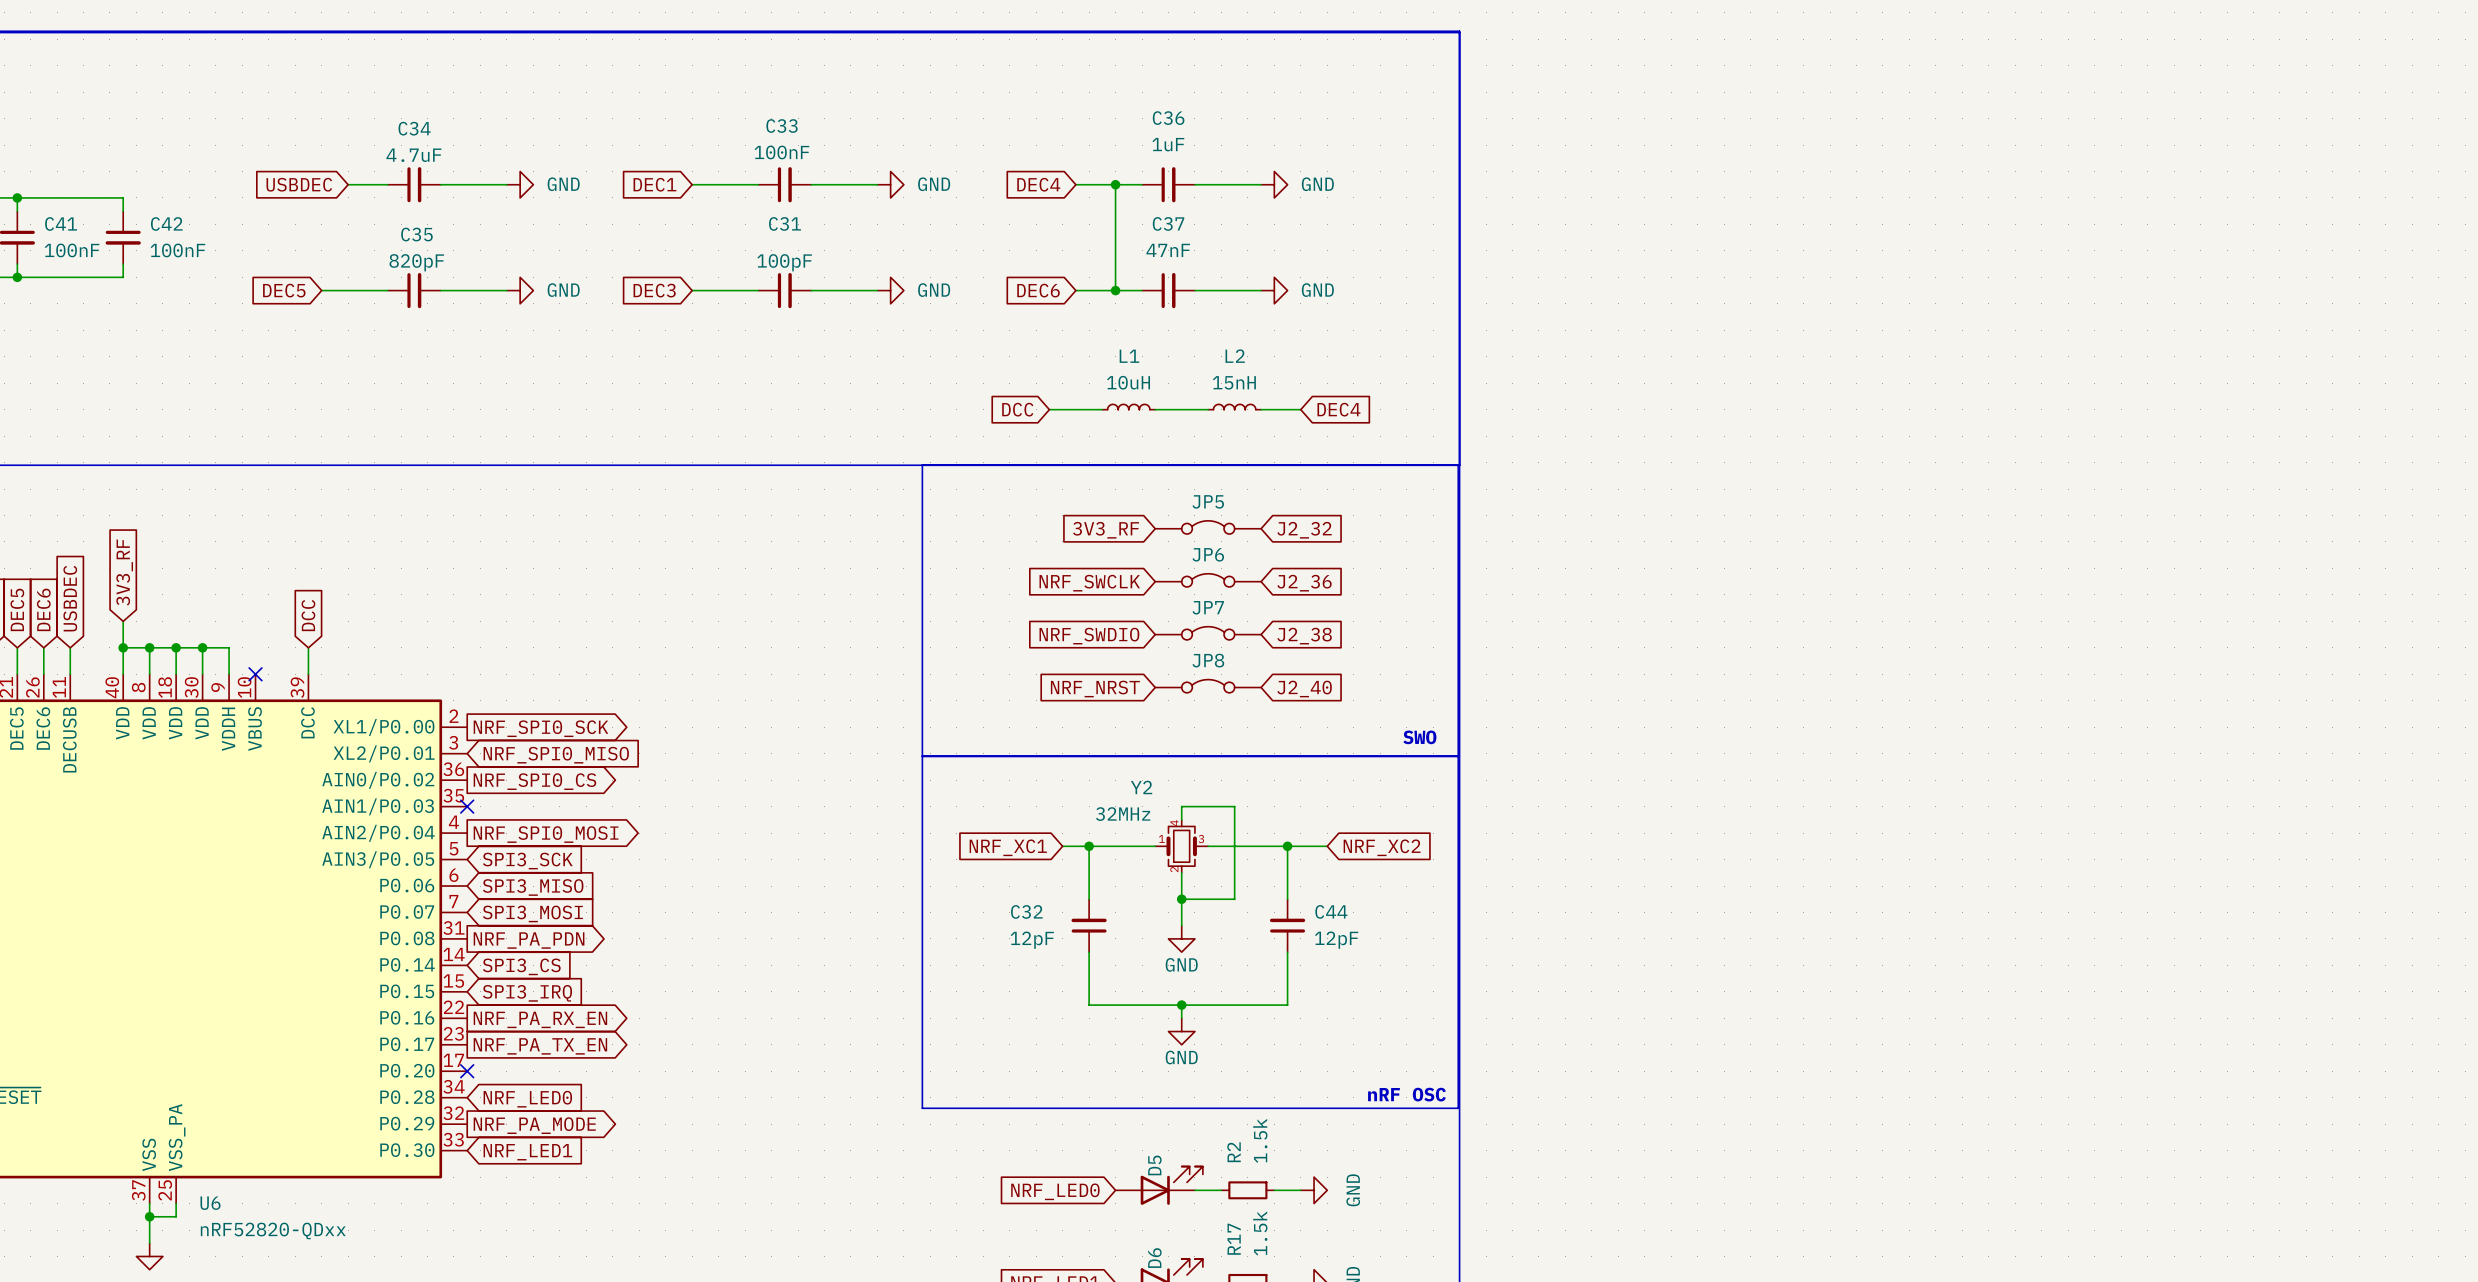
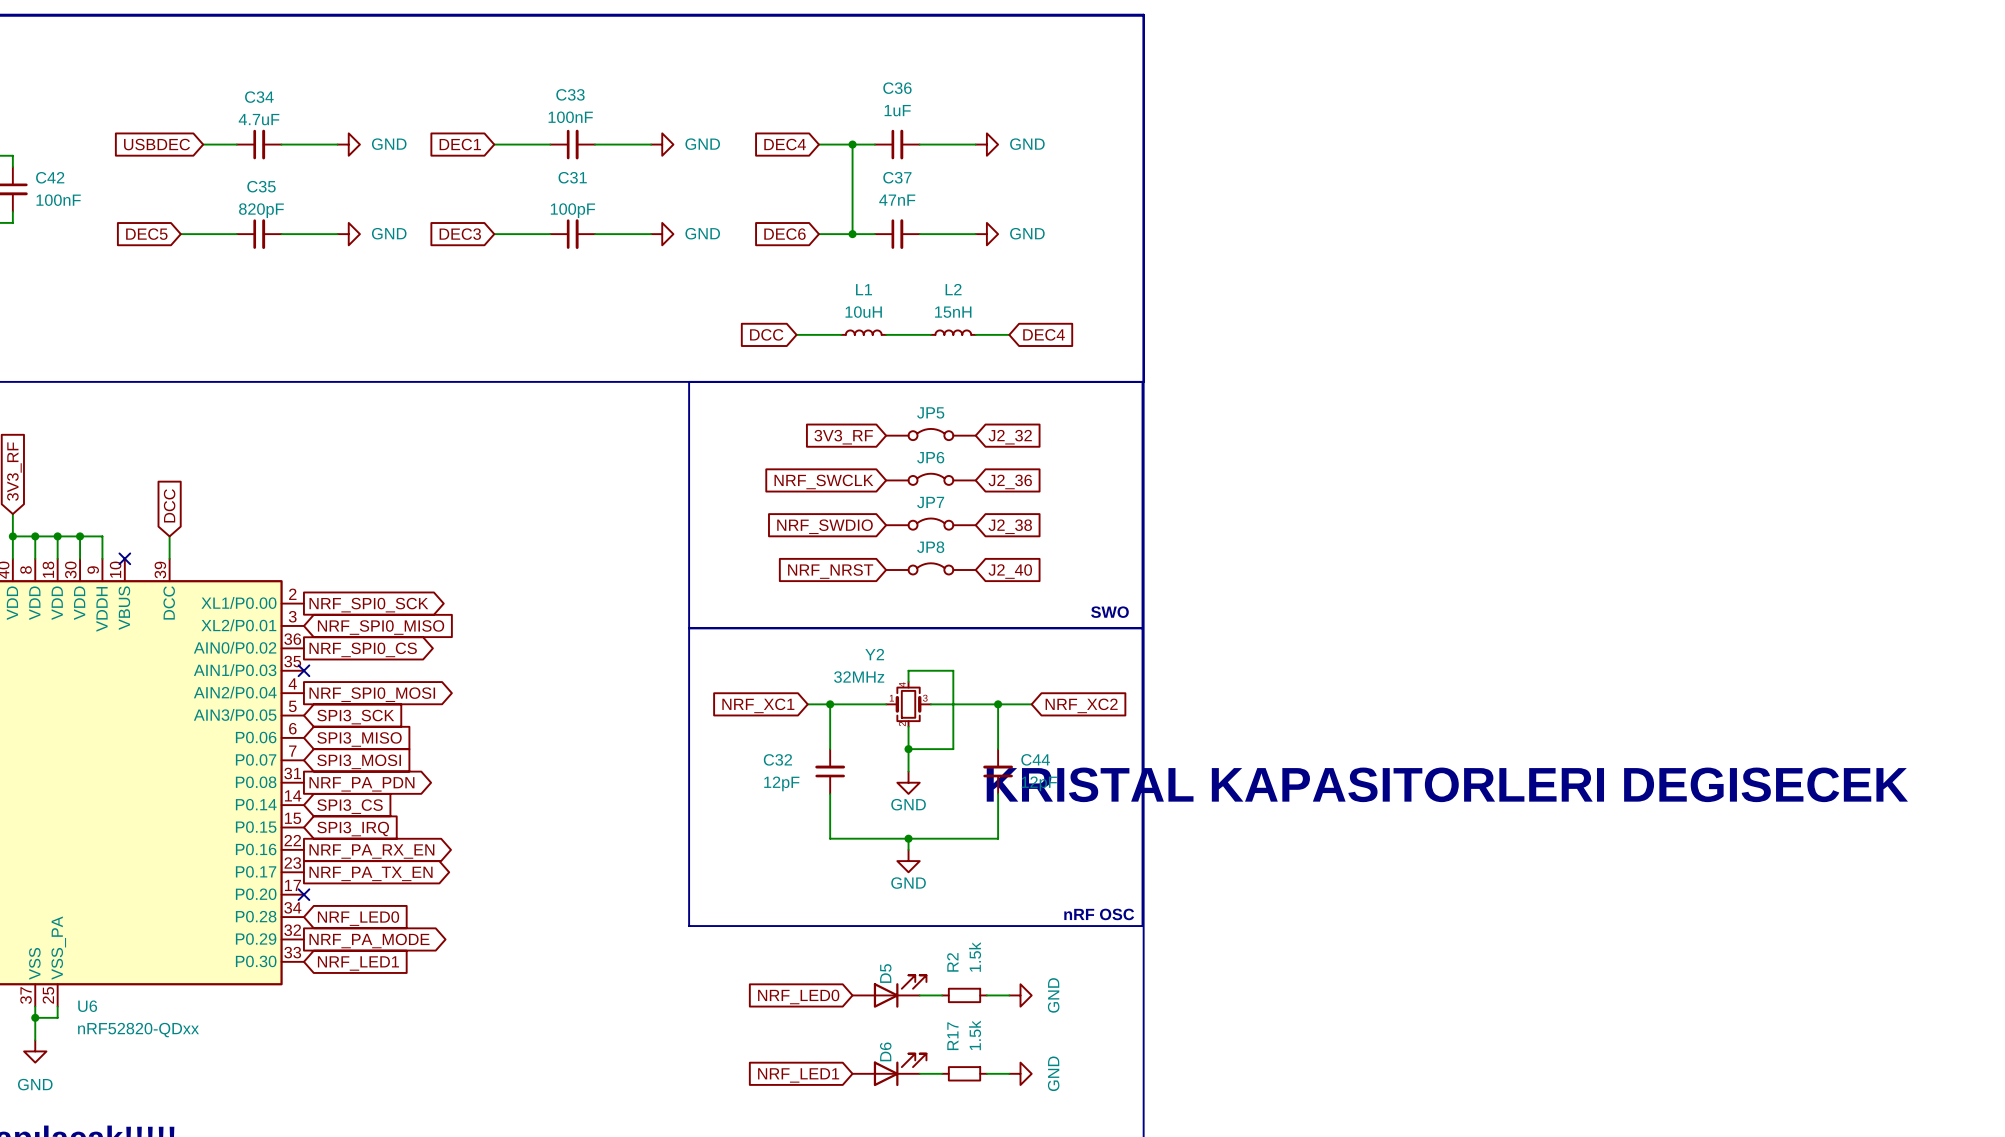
text: none -> KRISTAL KAPASITORLERI DEGISECEK (1447, 784)

